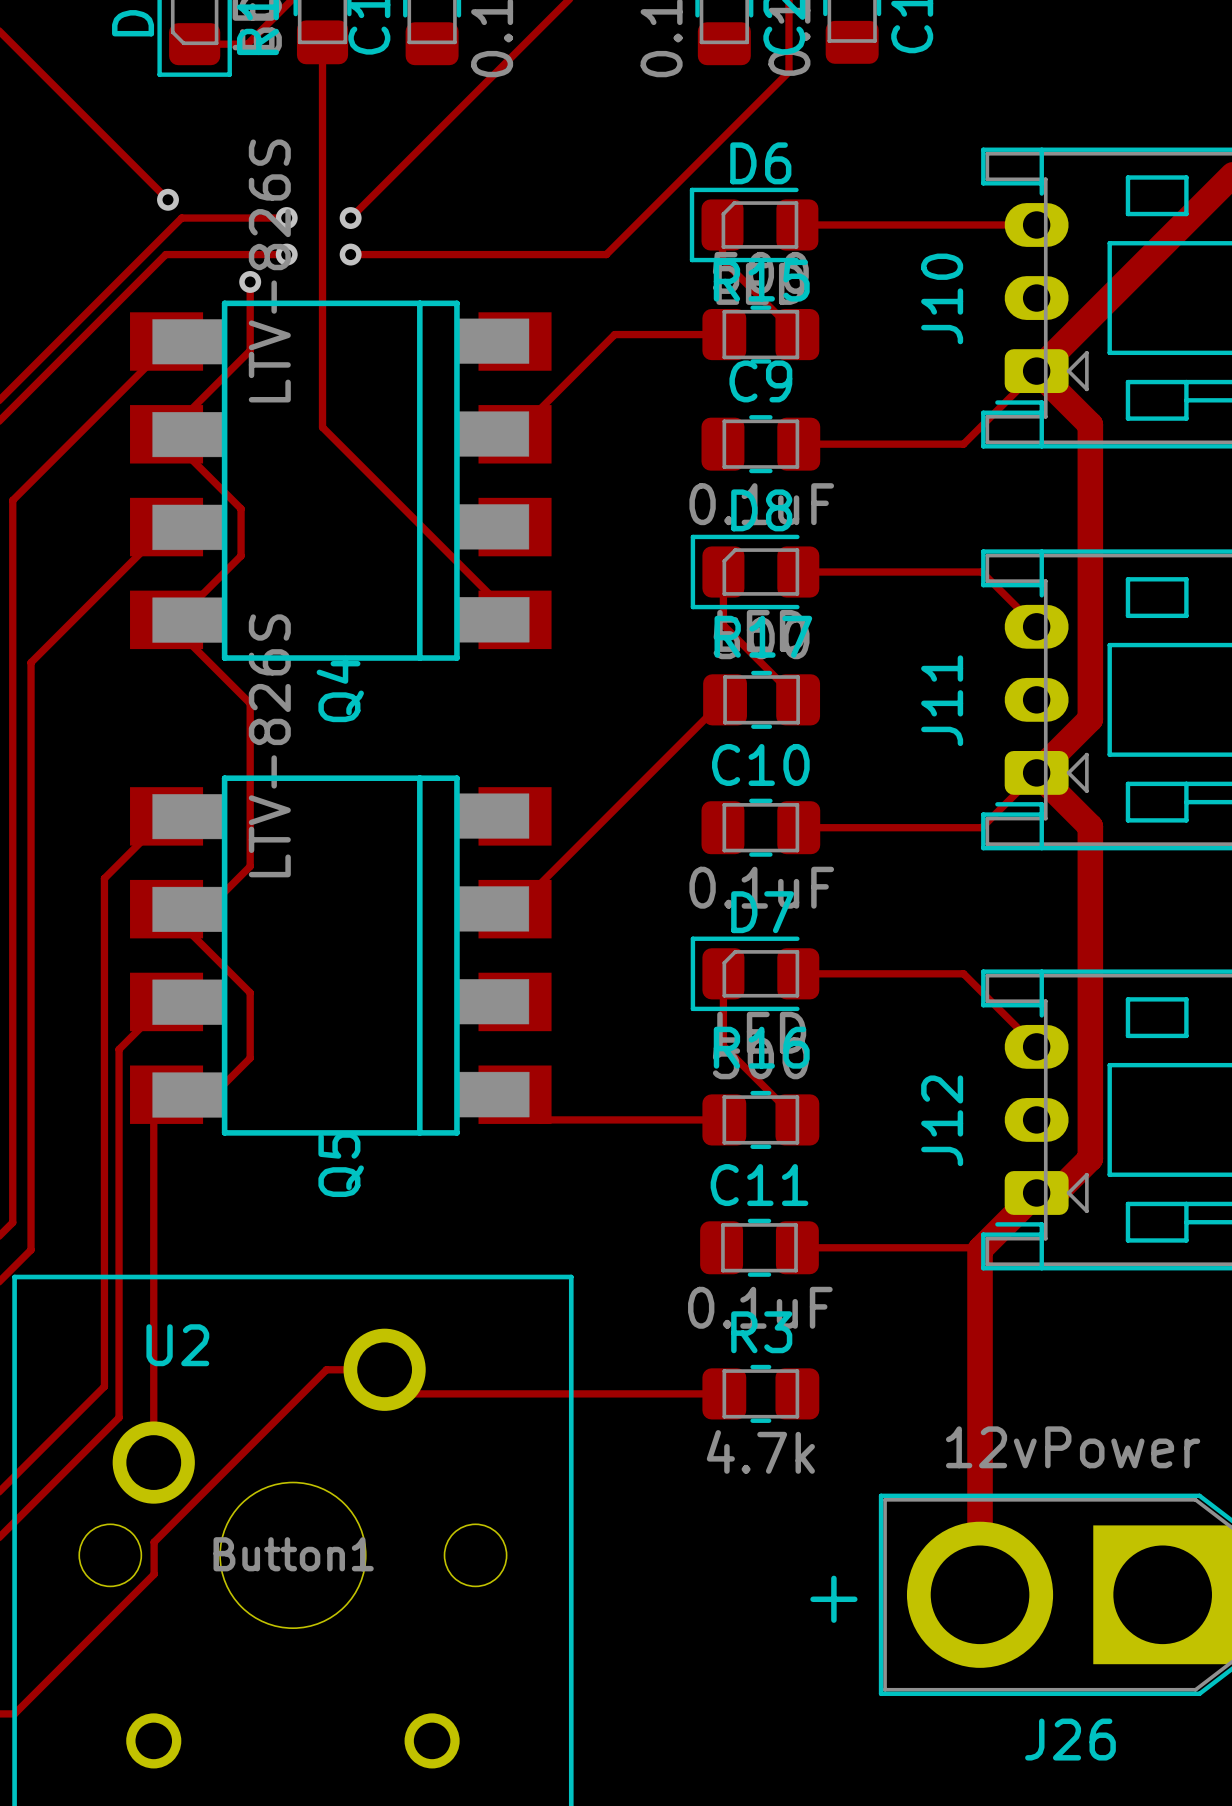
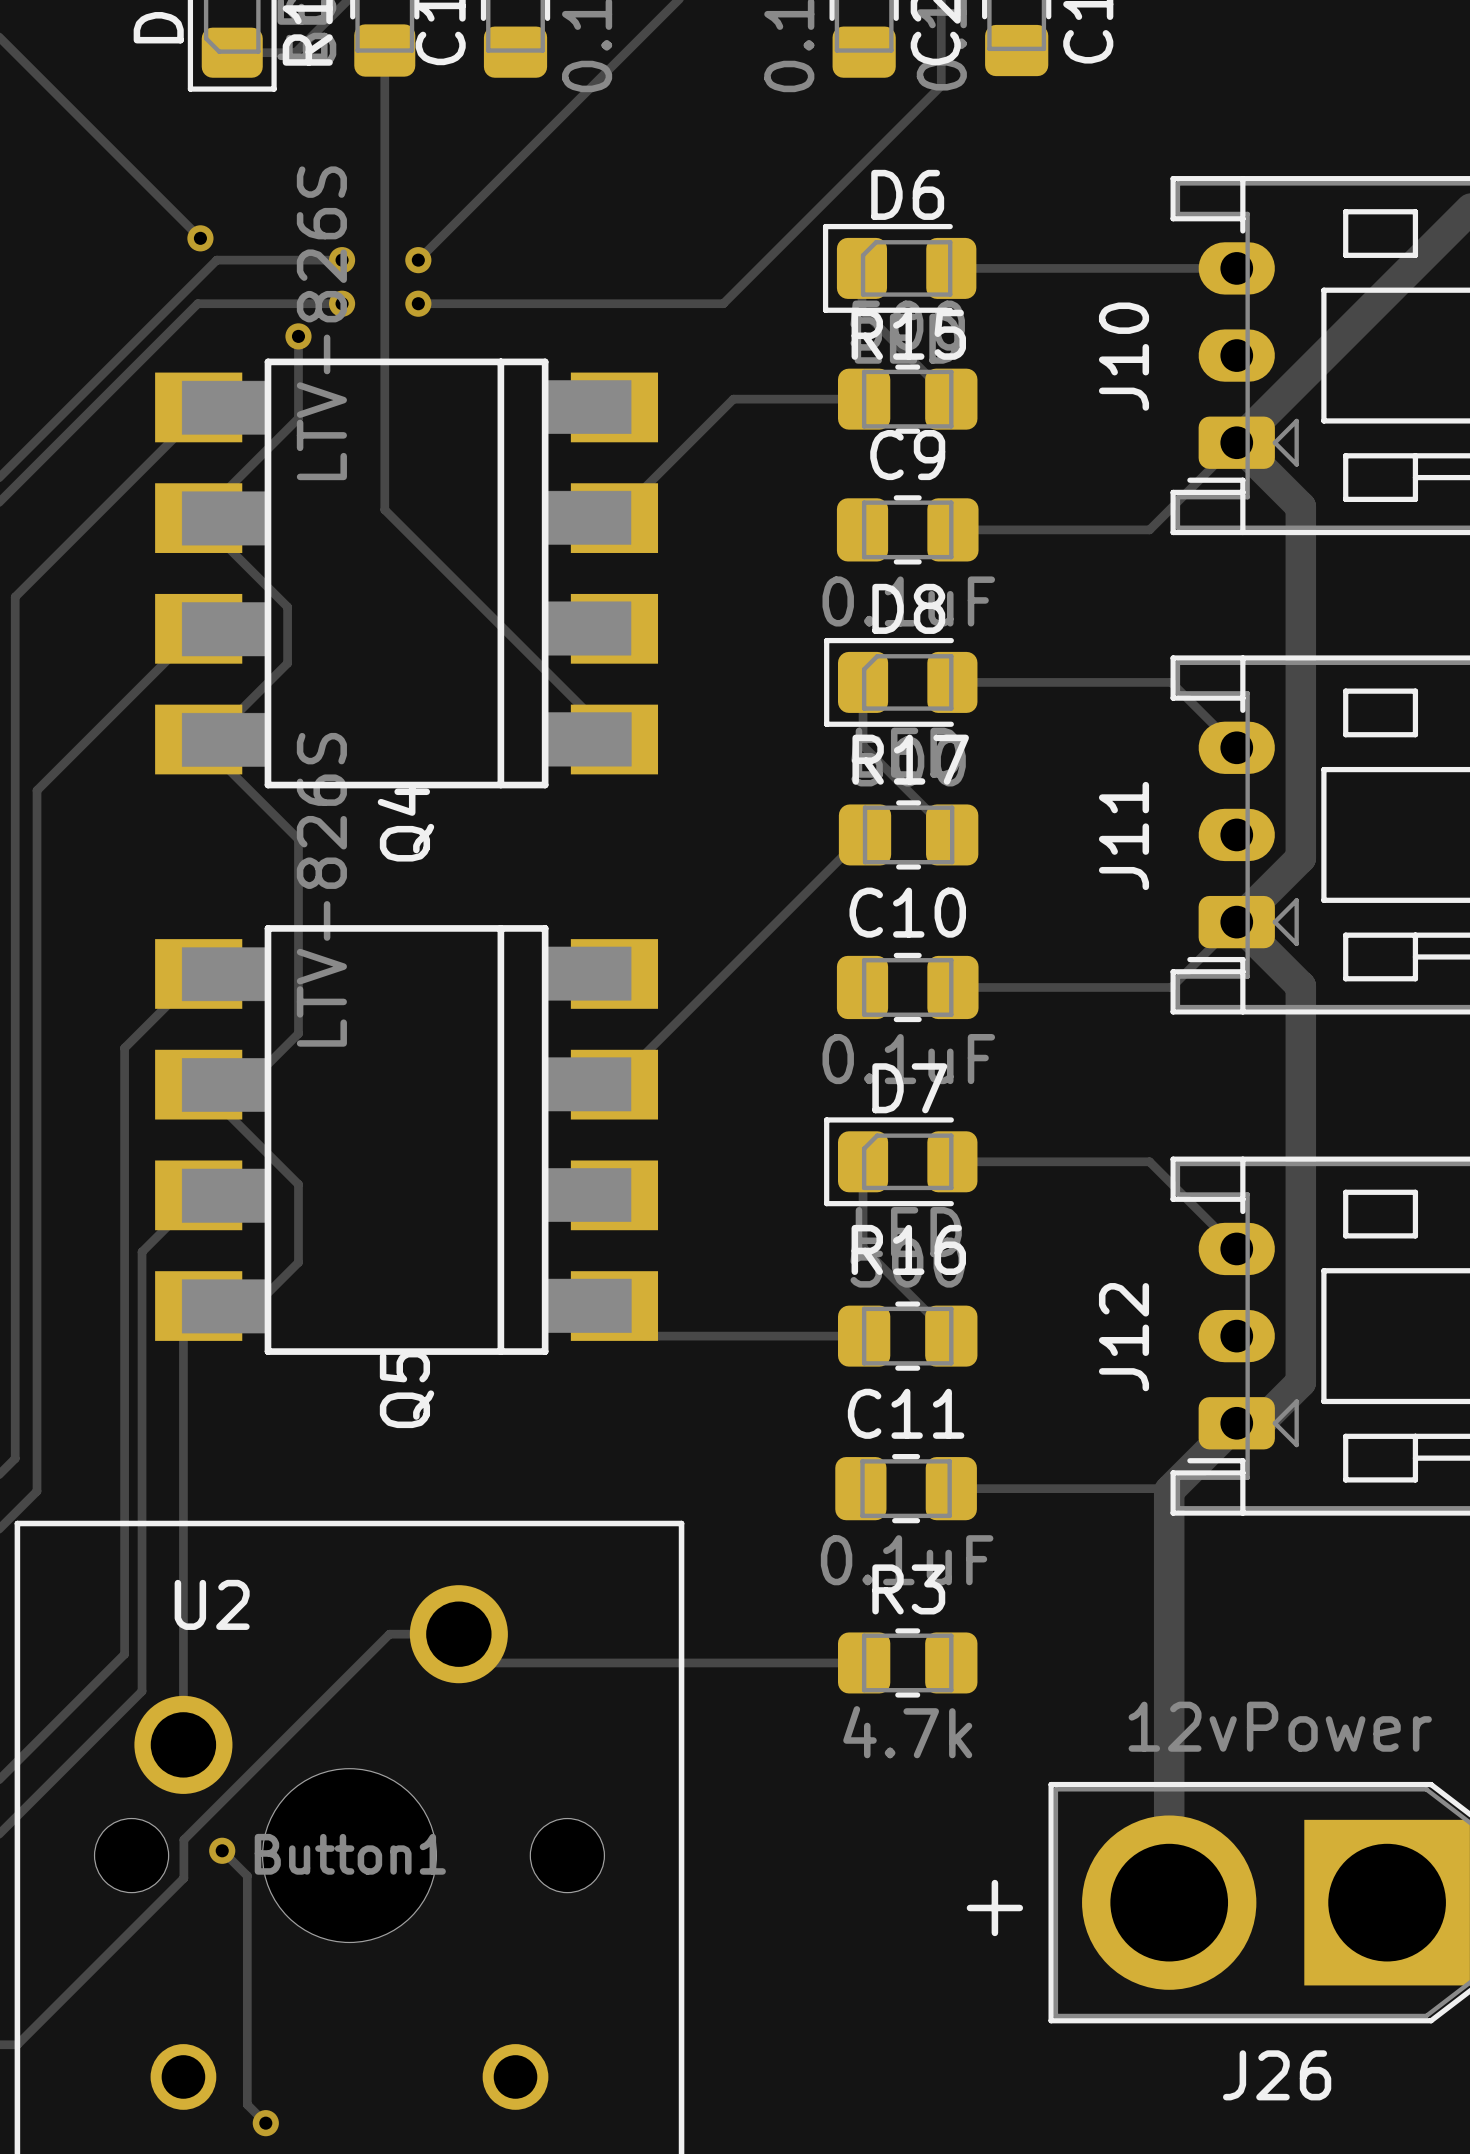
track: none -> (222, 1850) (247, 1875) (247, 2104) (265, 2123)
via: none -> (222, 1850)
via: none -> (265, 2123)

